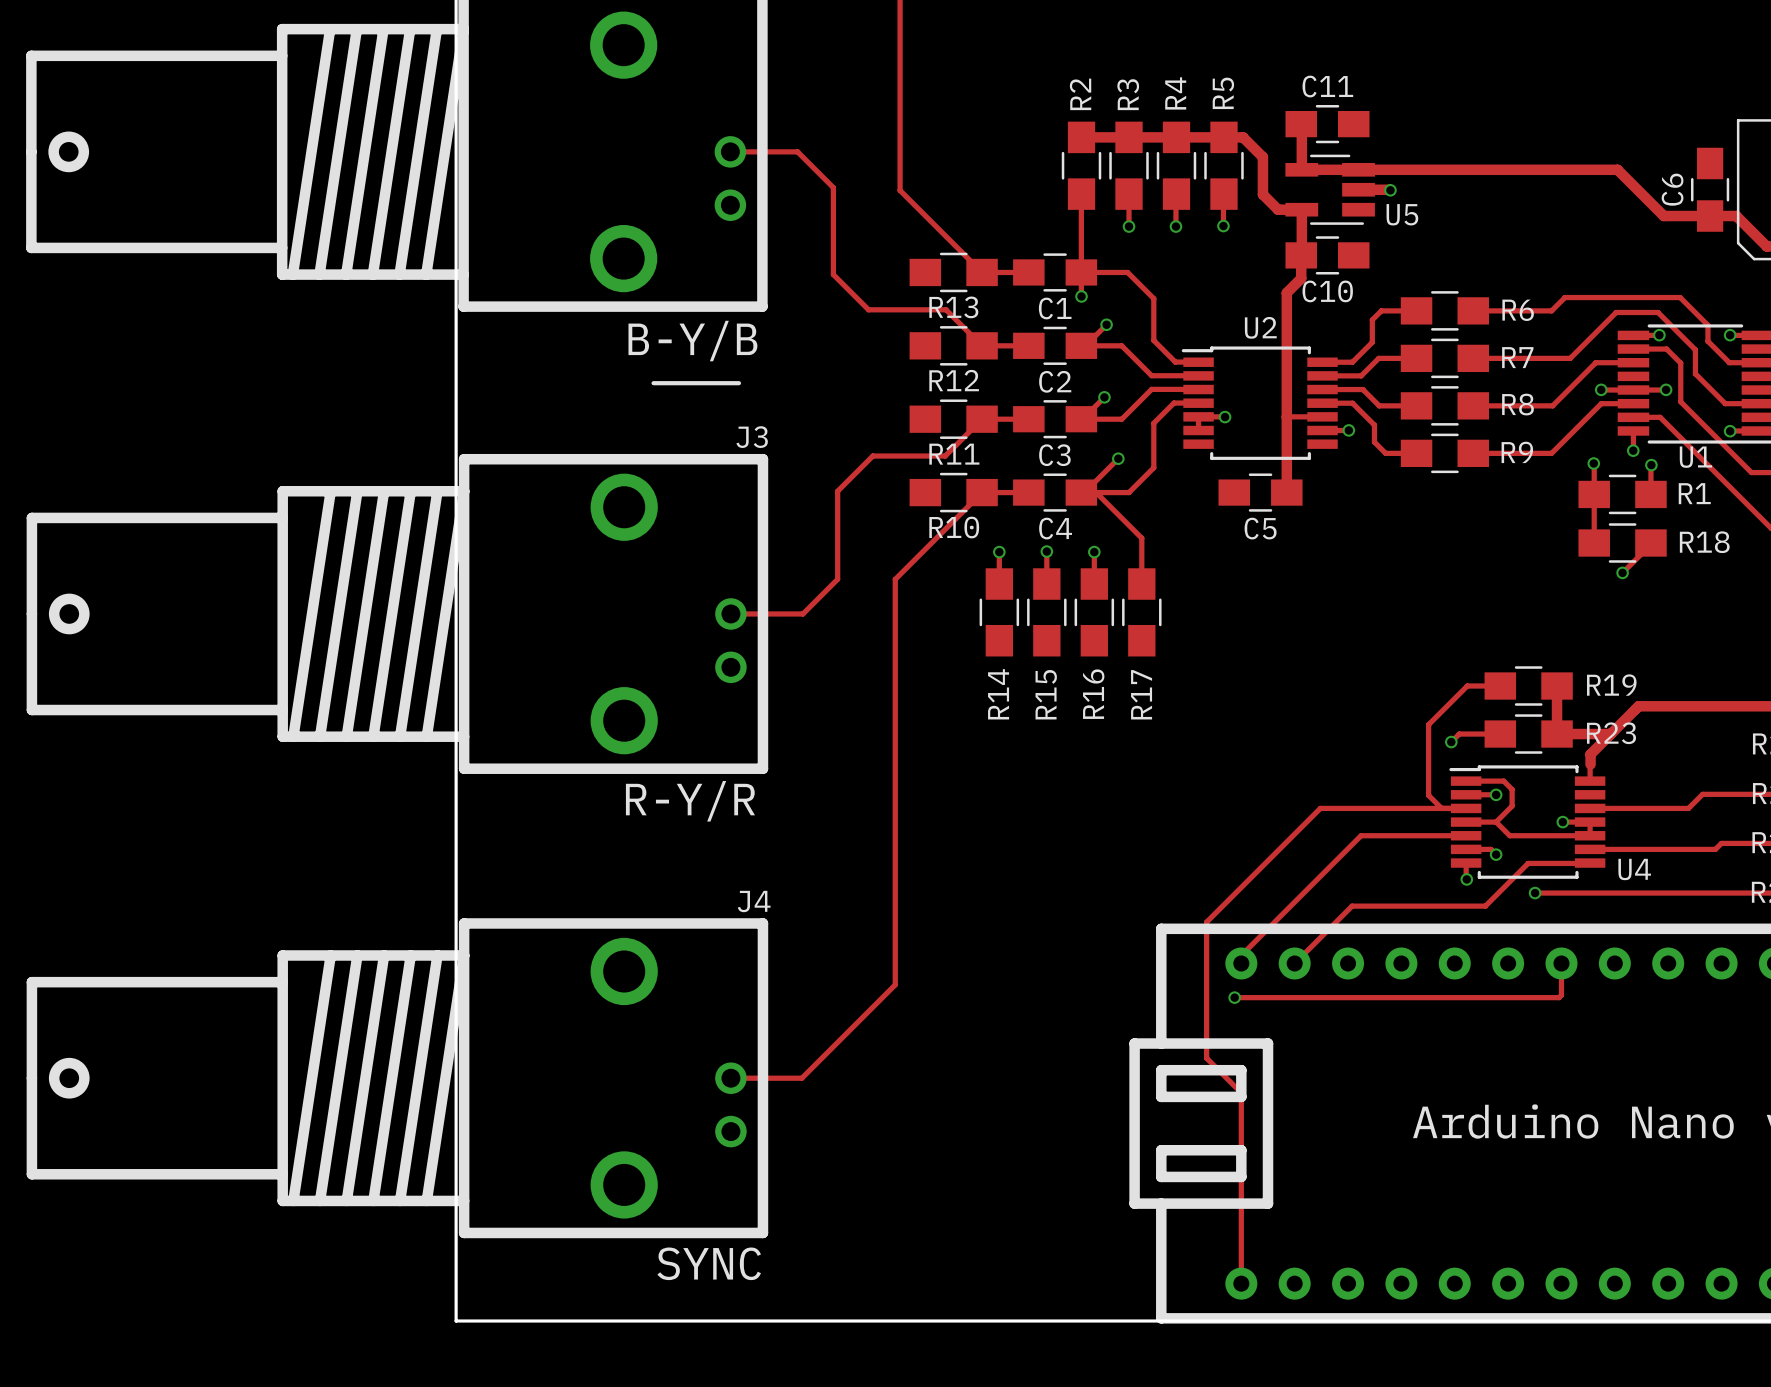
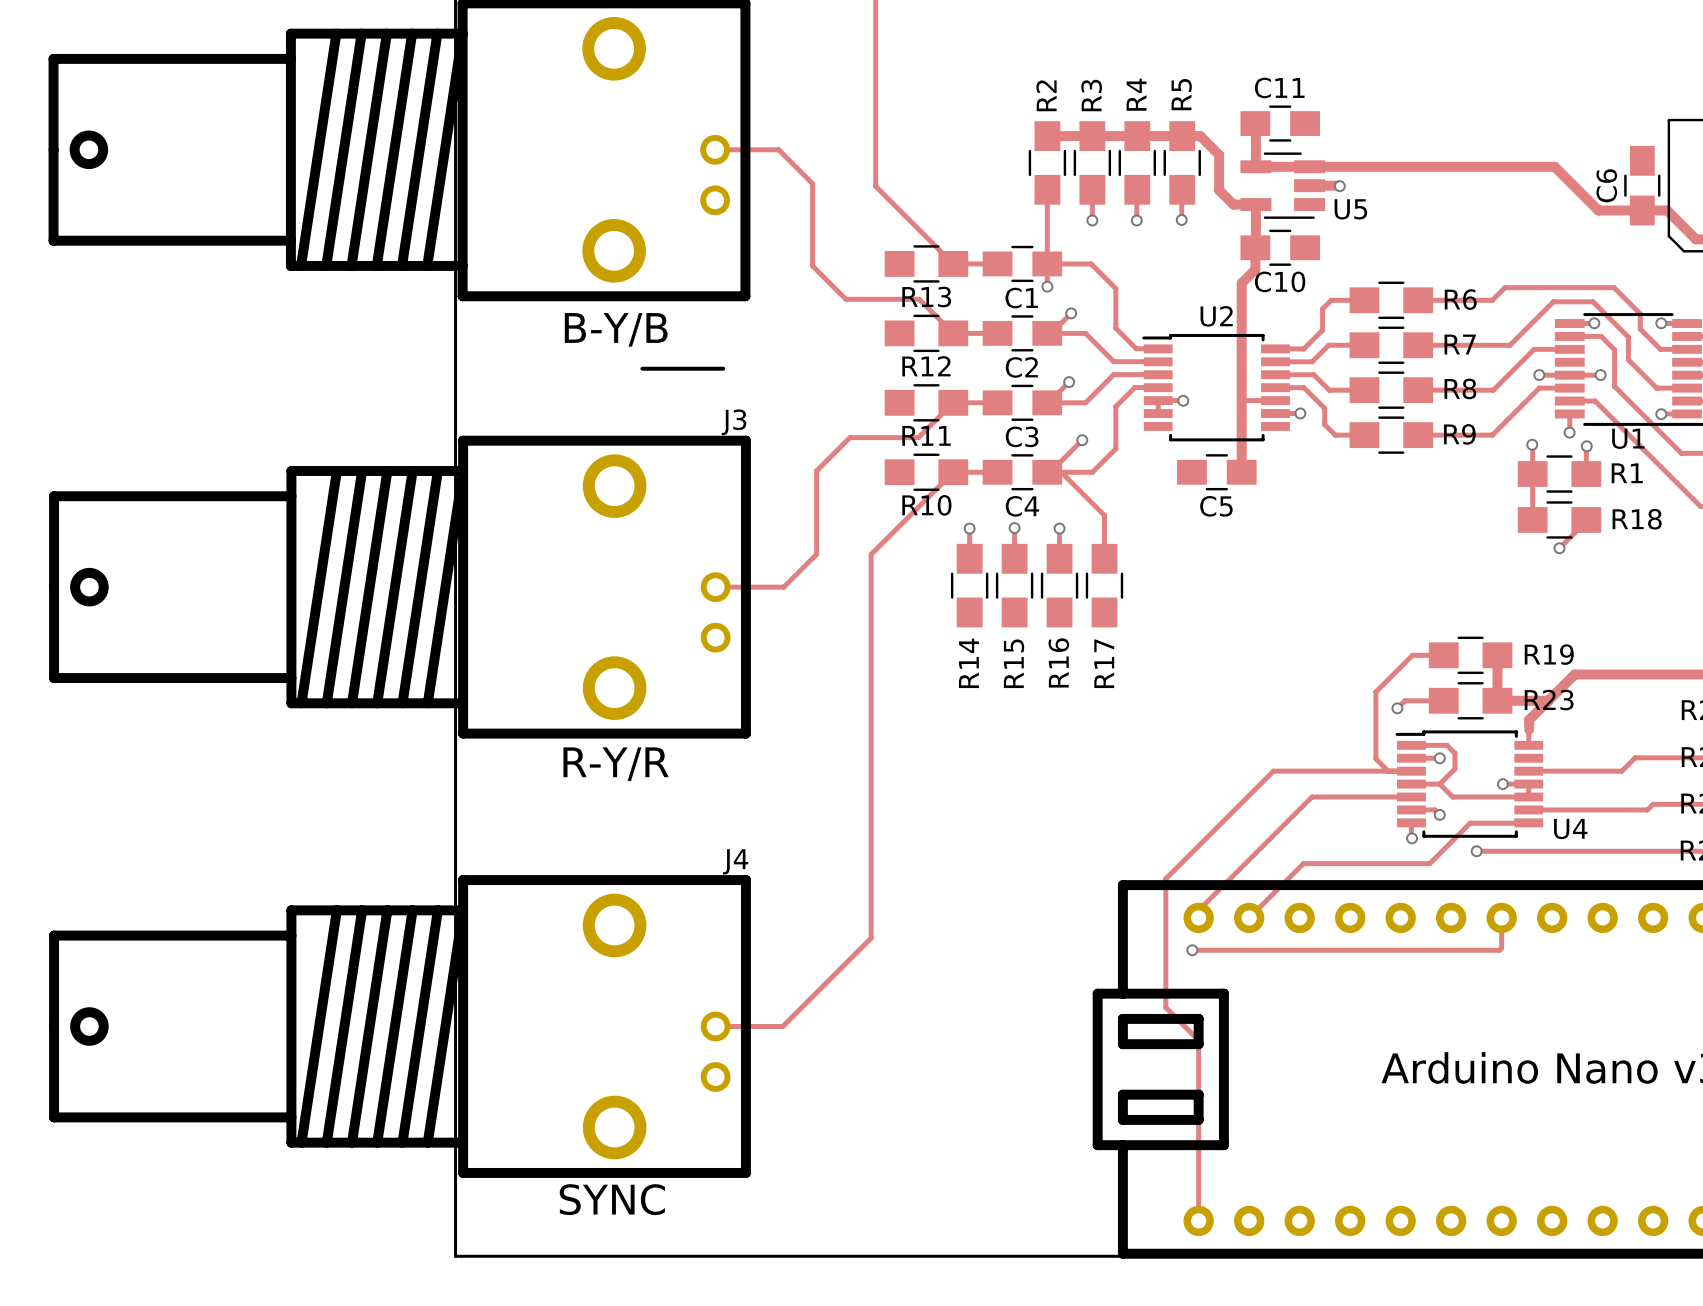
text position: B-Y/B (692, 341) -> B-Y/B (616, 329)
text position: R-Y/R (690, 801) -> R-Y/R (616, 764)
text position: SYNC (709, 1263) -> SYNC (612, 1199)

